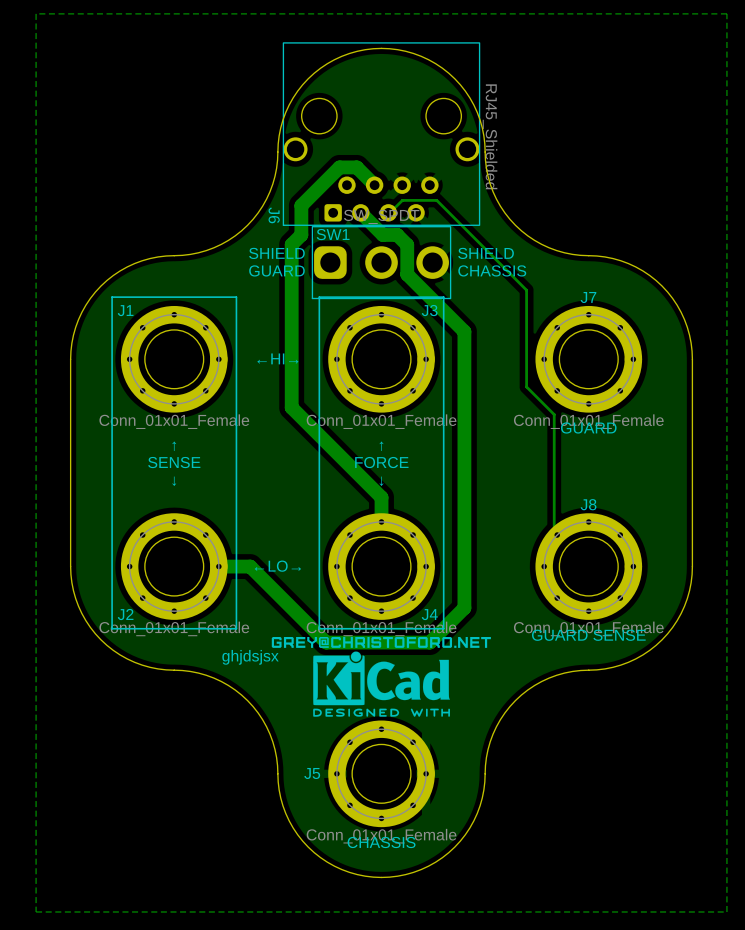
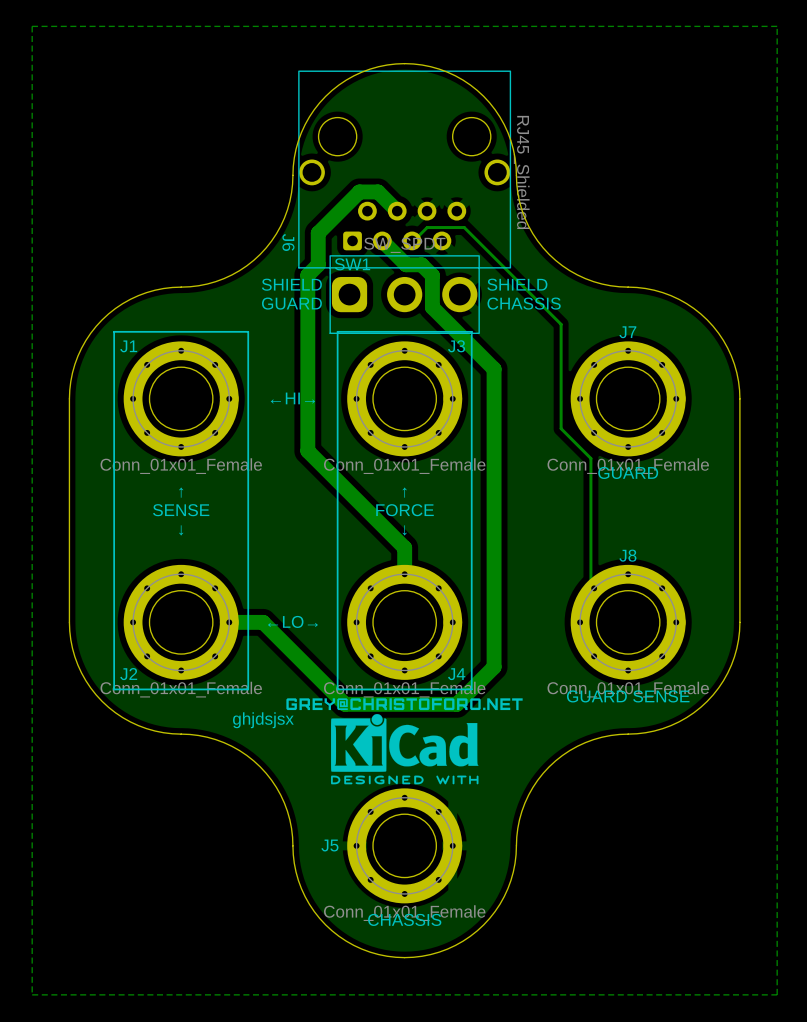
J6 footprint: [282, 42, 481, 226] -> [298, 70, 512, 269]

